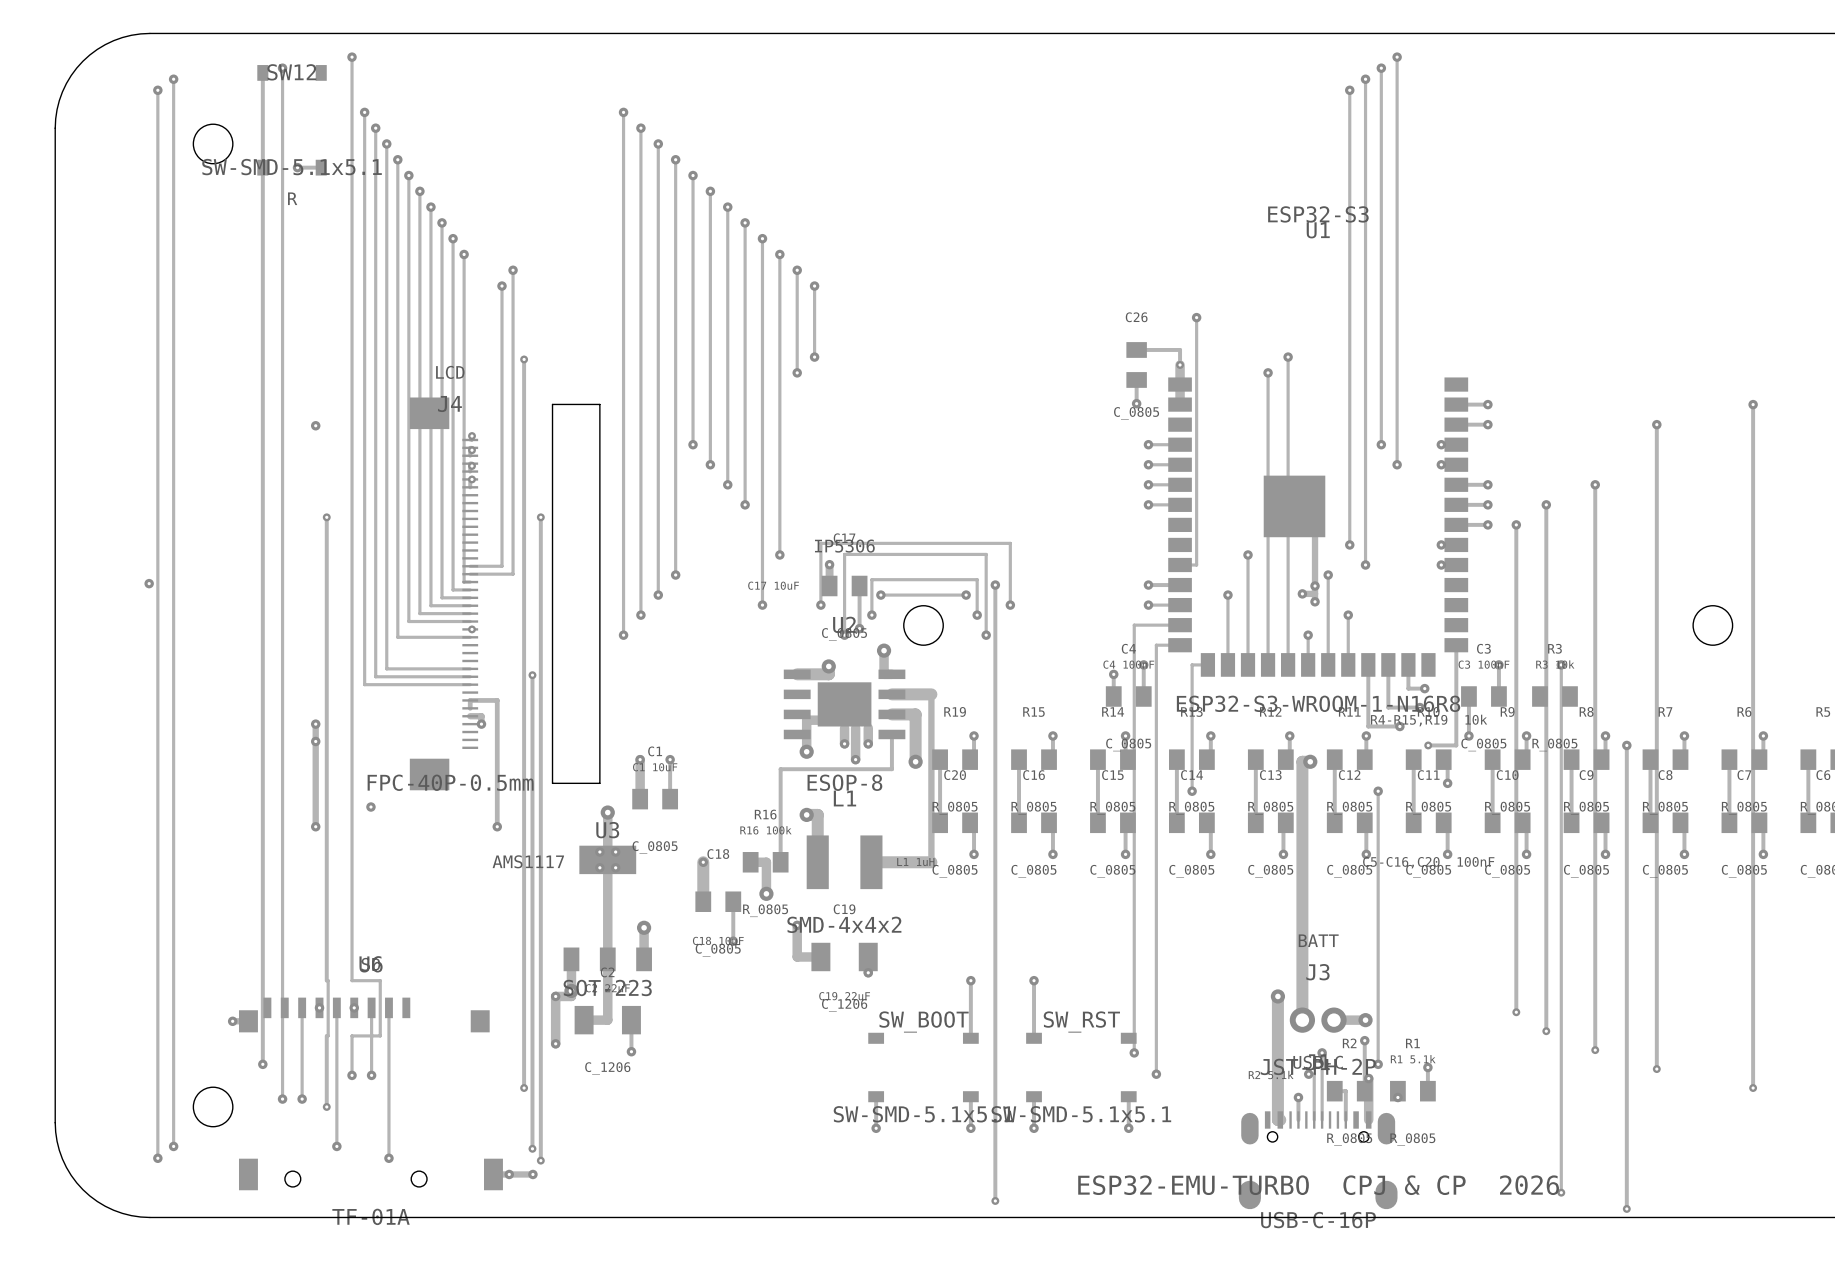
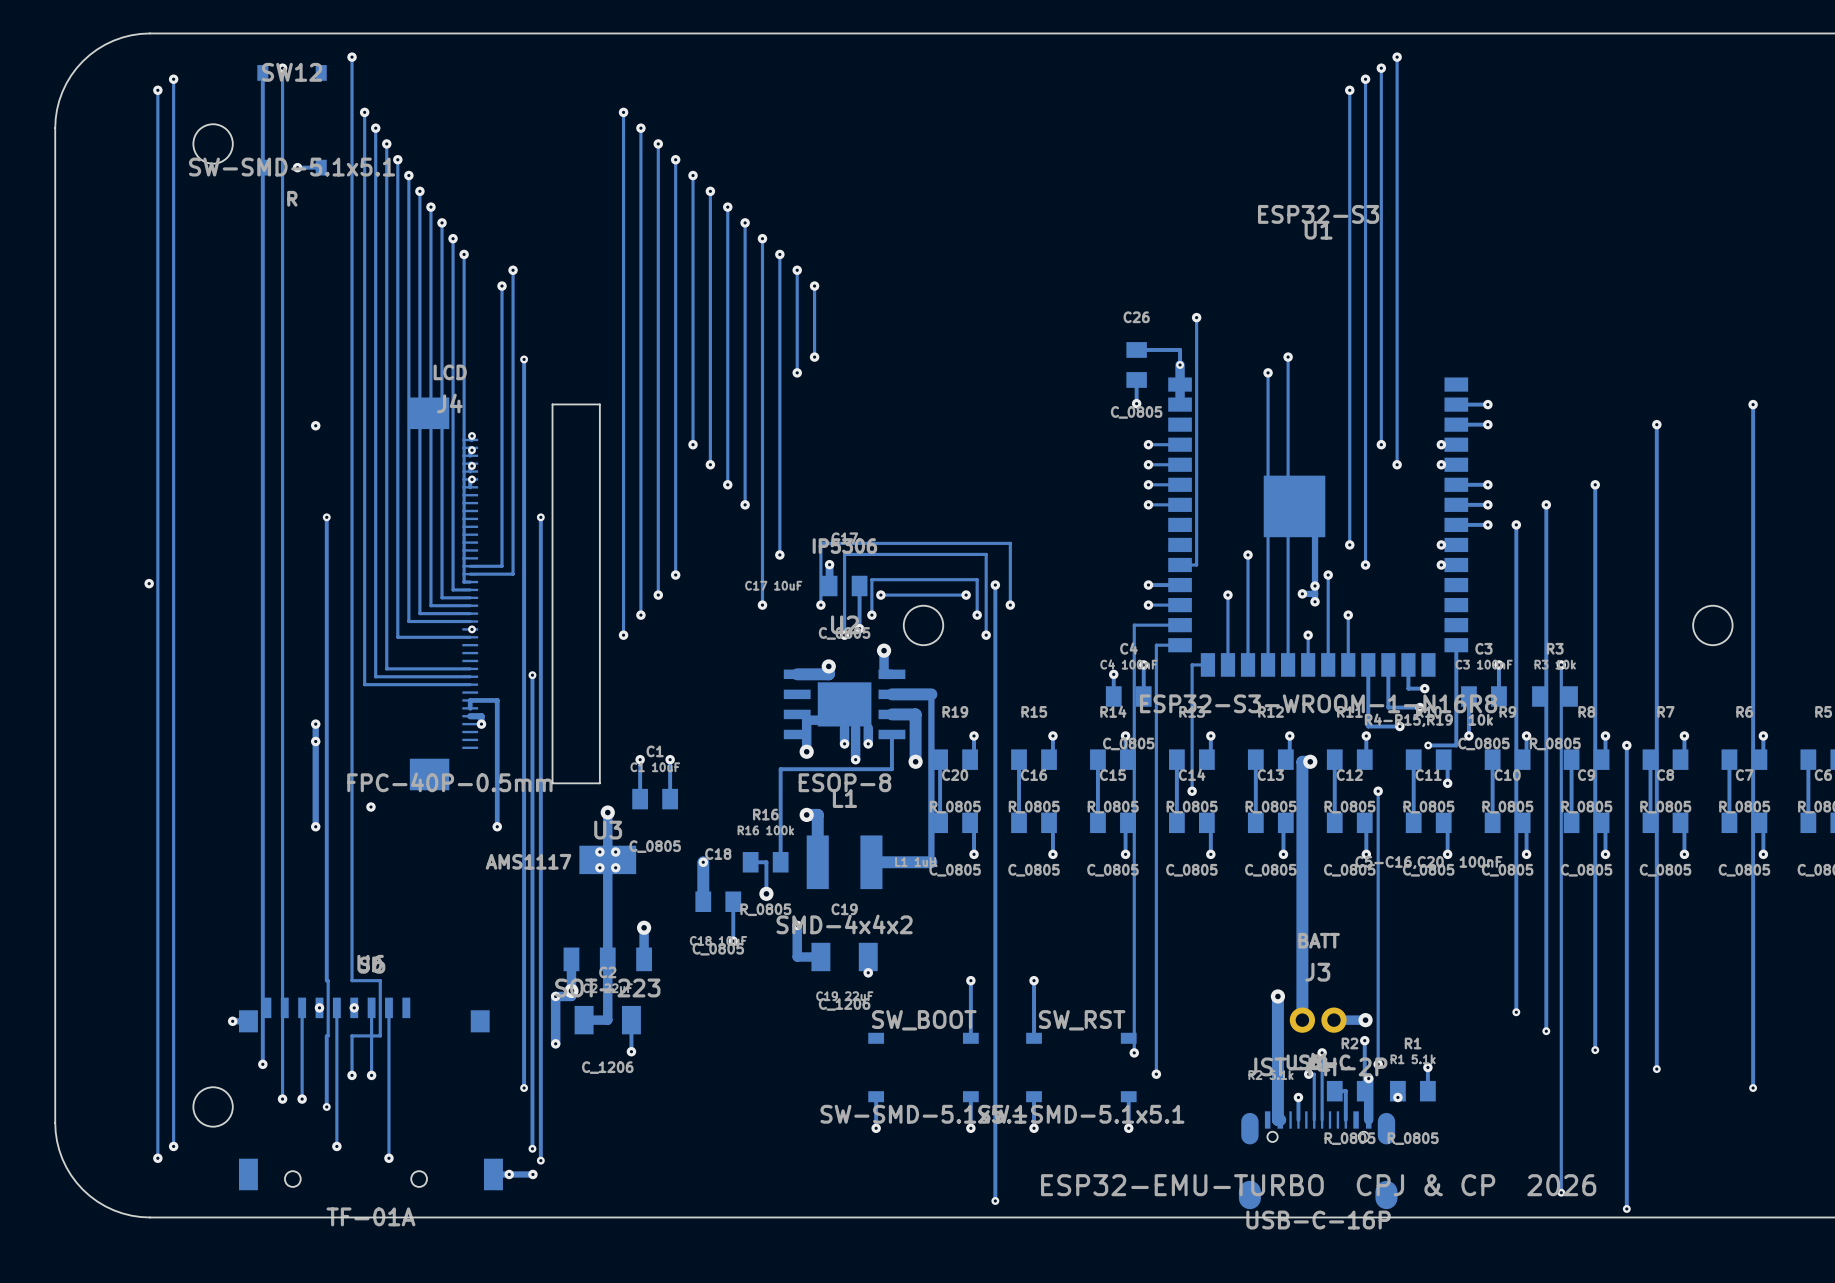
track width: thick (640, 759) (640, 799) -> thin (640, 759) (640, 799)
track width: thick (750, 862) (766, 862) (766, 893) -> thin (750, 862) (766, 862) (766, 893)

